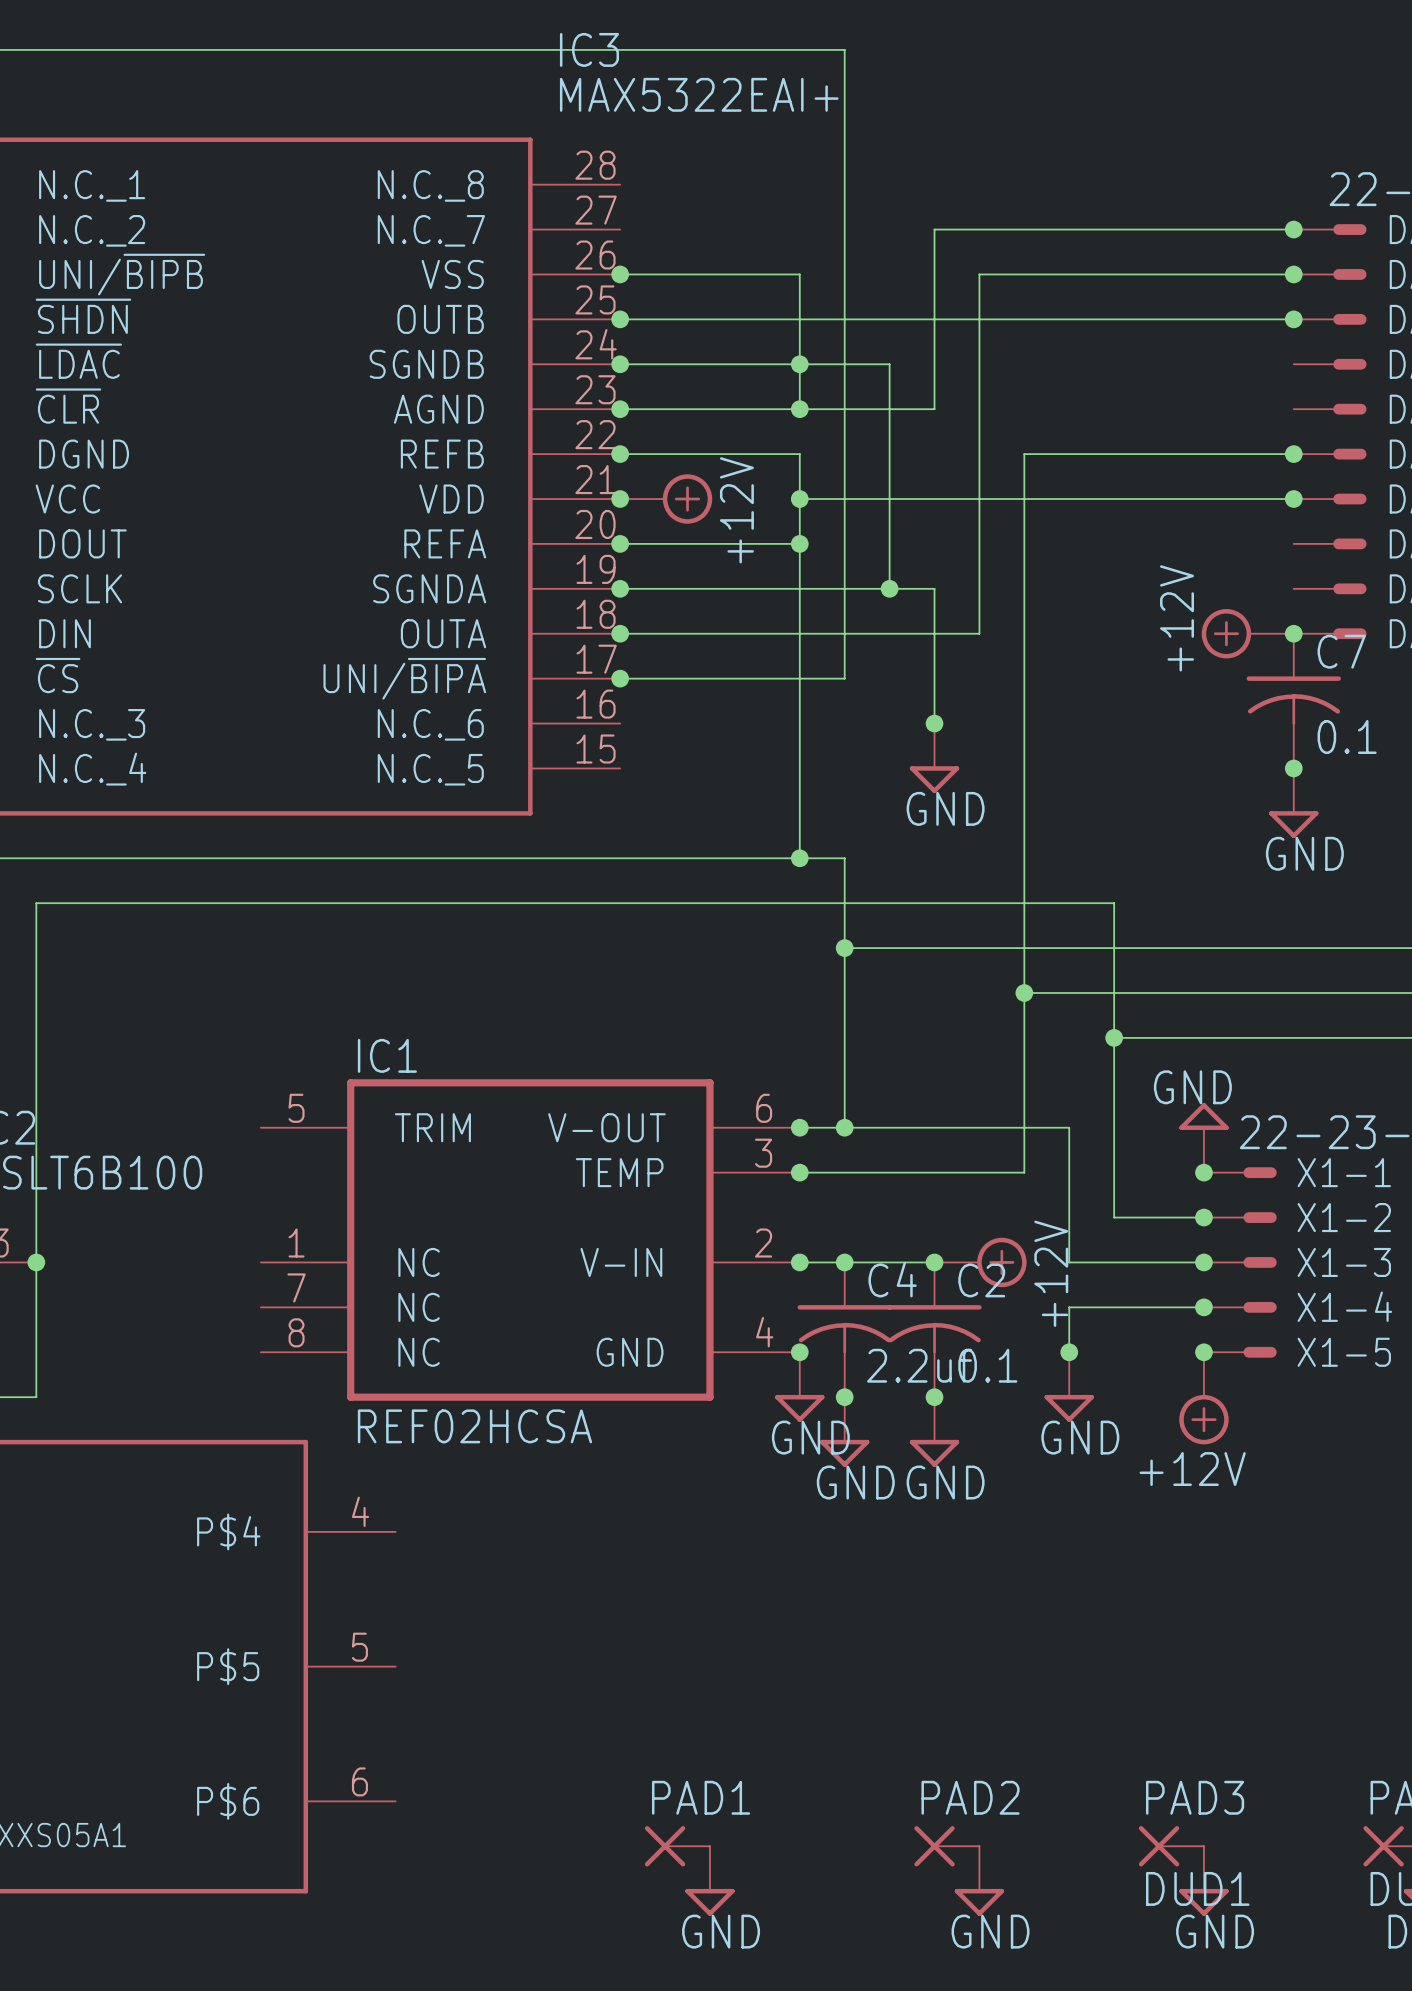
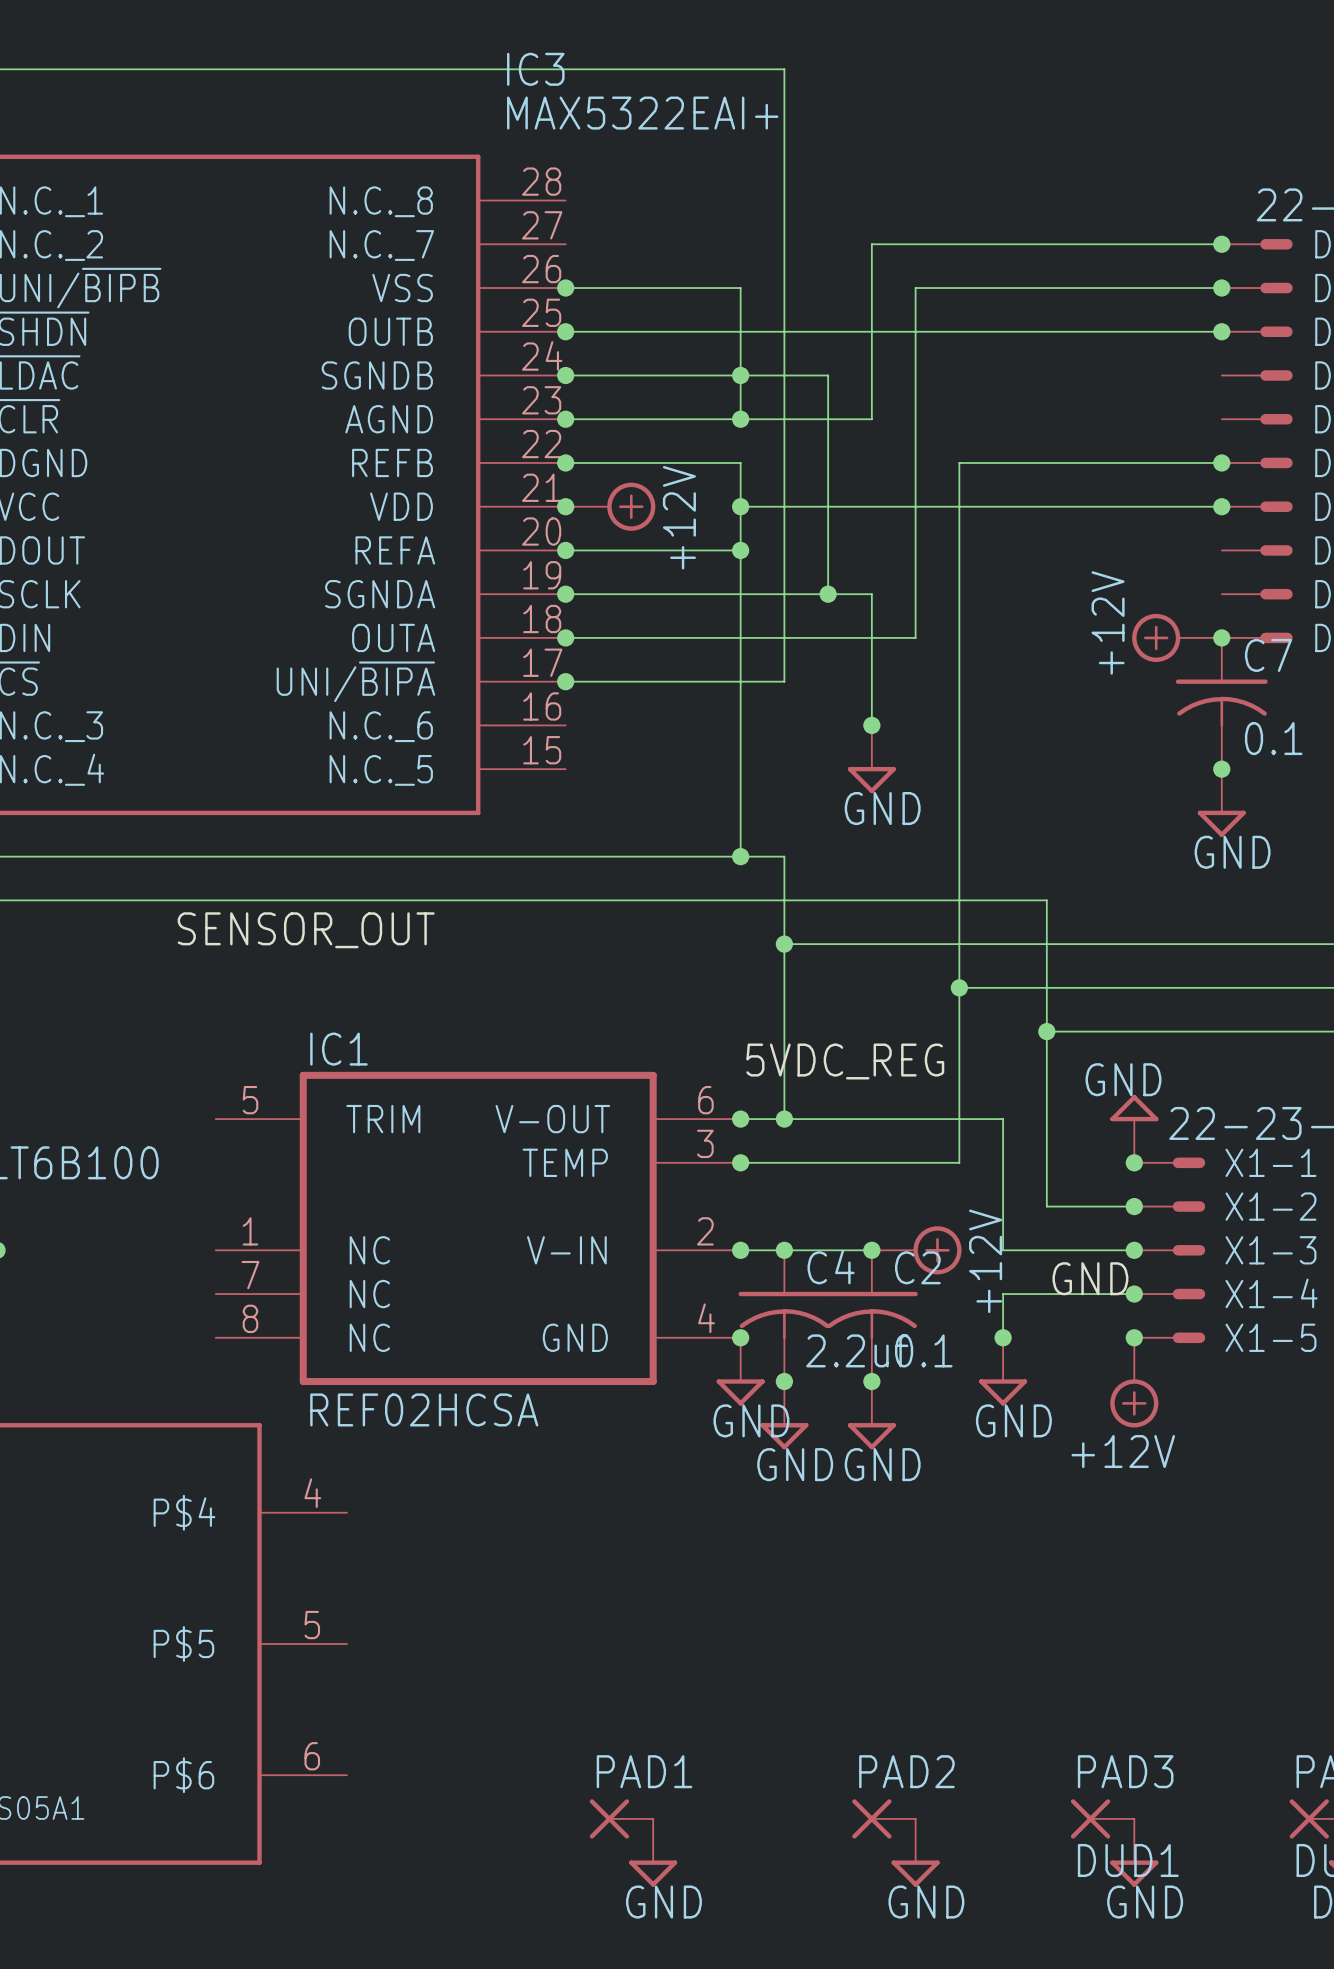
label: none -> SENSOR_OUT (306, 930)
label: none -> 5VDC_REG (845, 1061)
label: none -> GND (1090, 1278)

